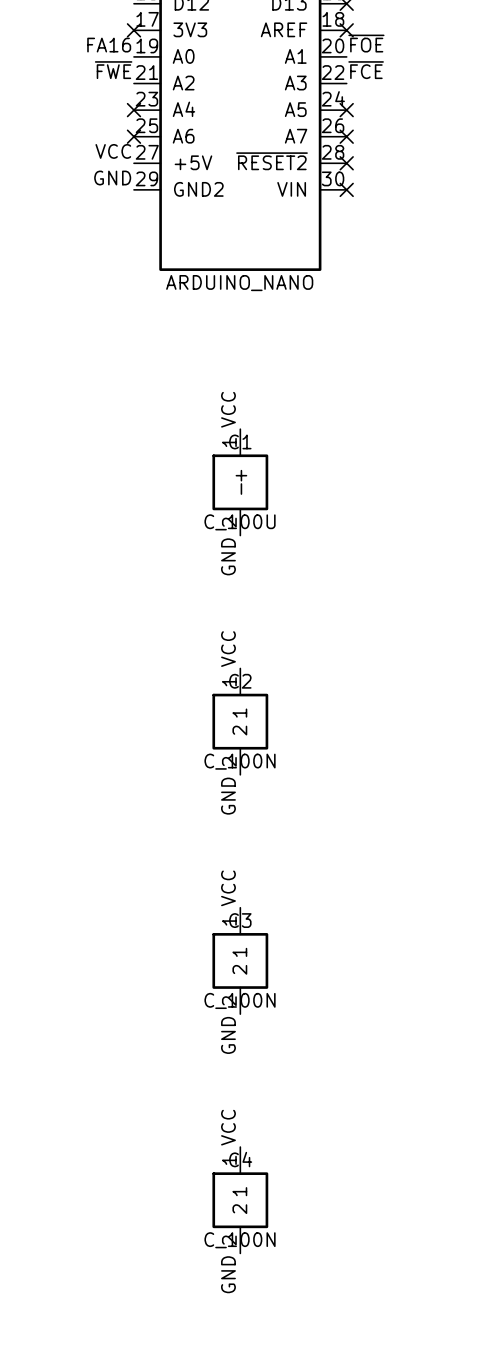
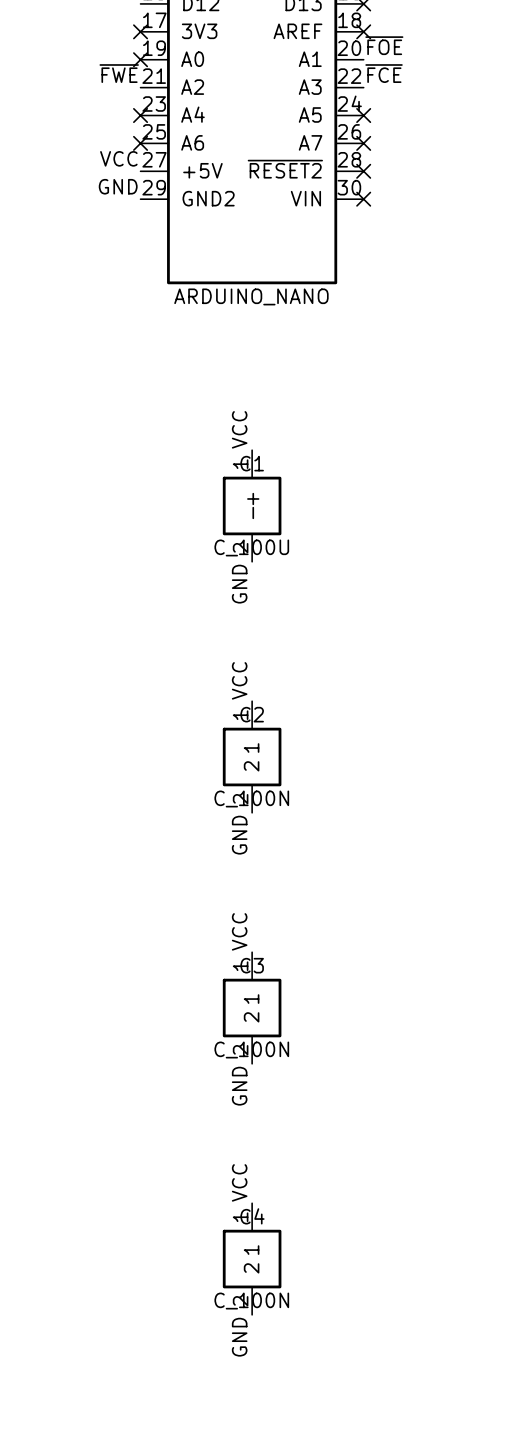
label: FA16 (109, 45) -> none
no-connect mark: none -> (140, 59)

